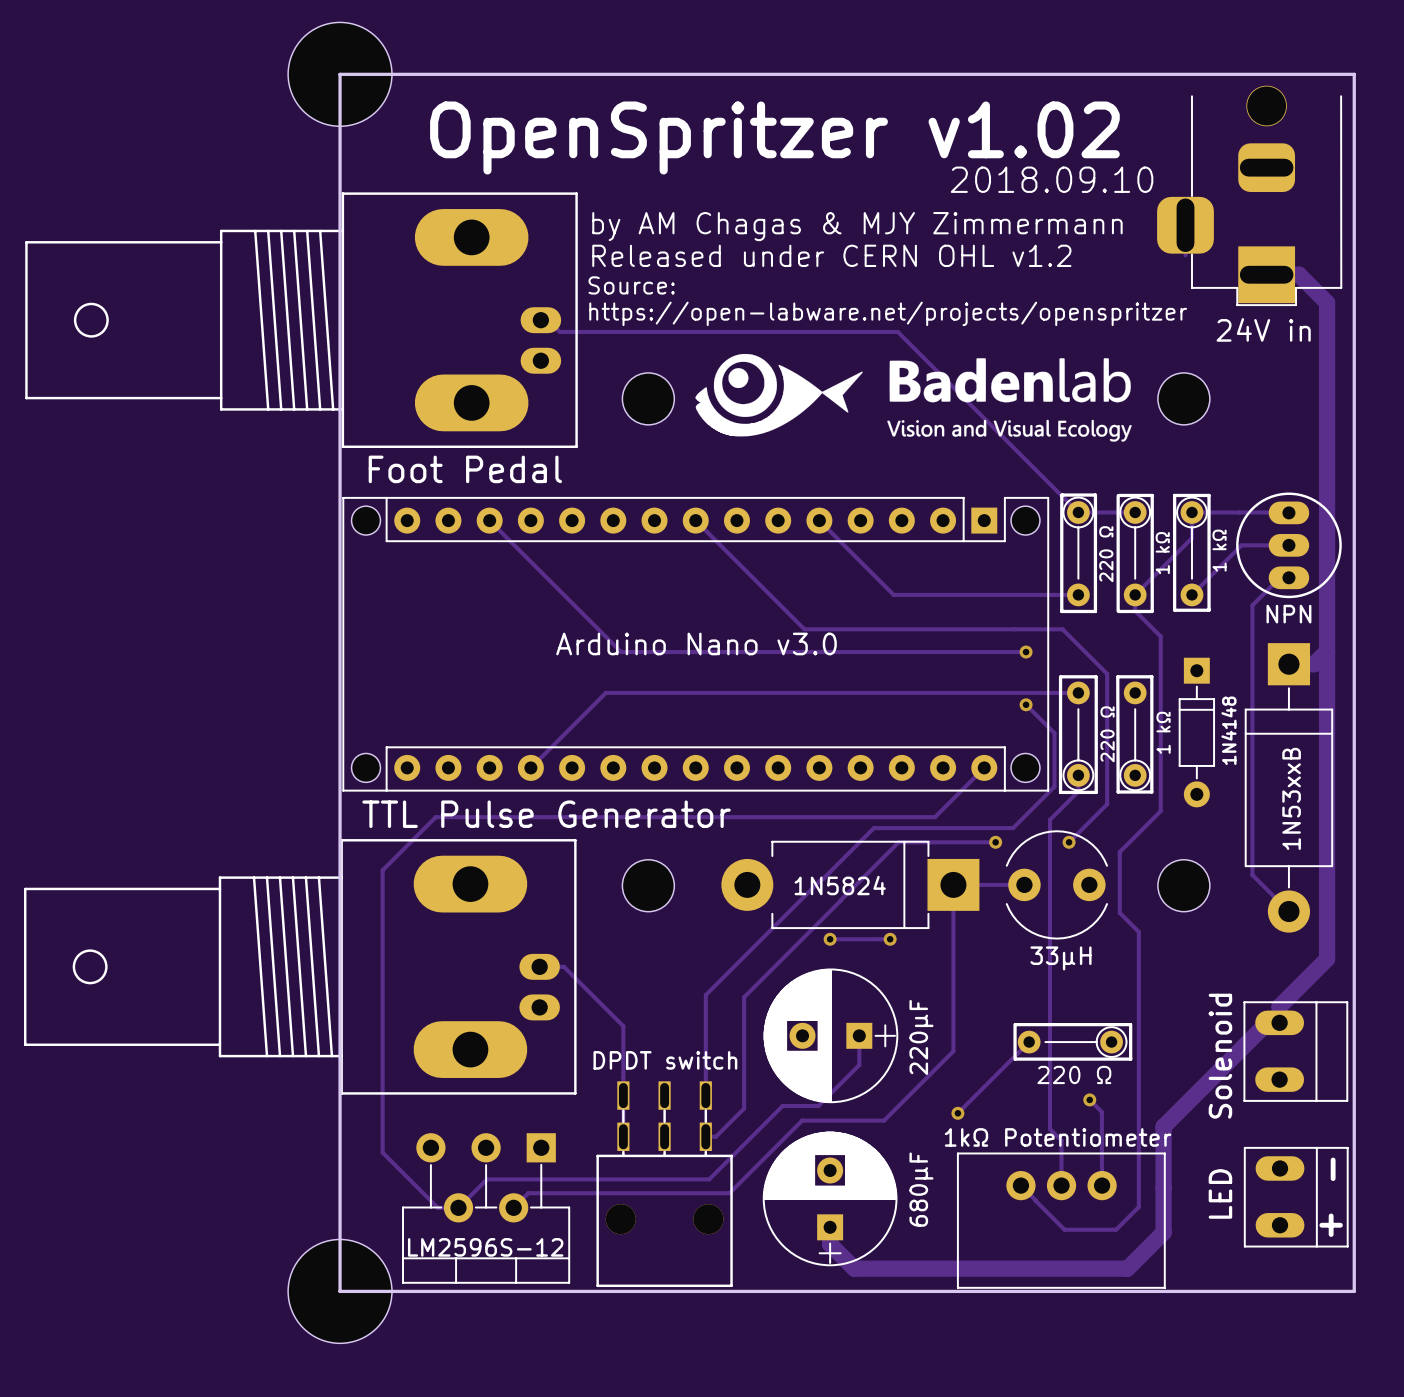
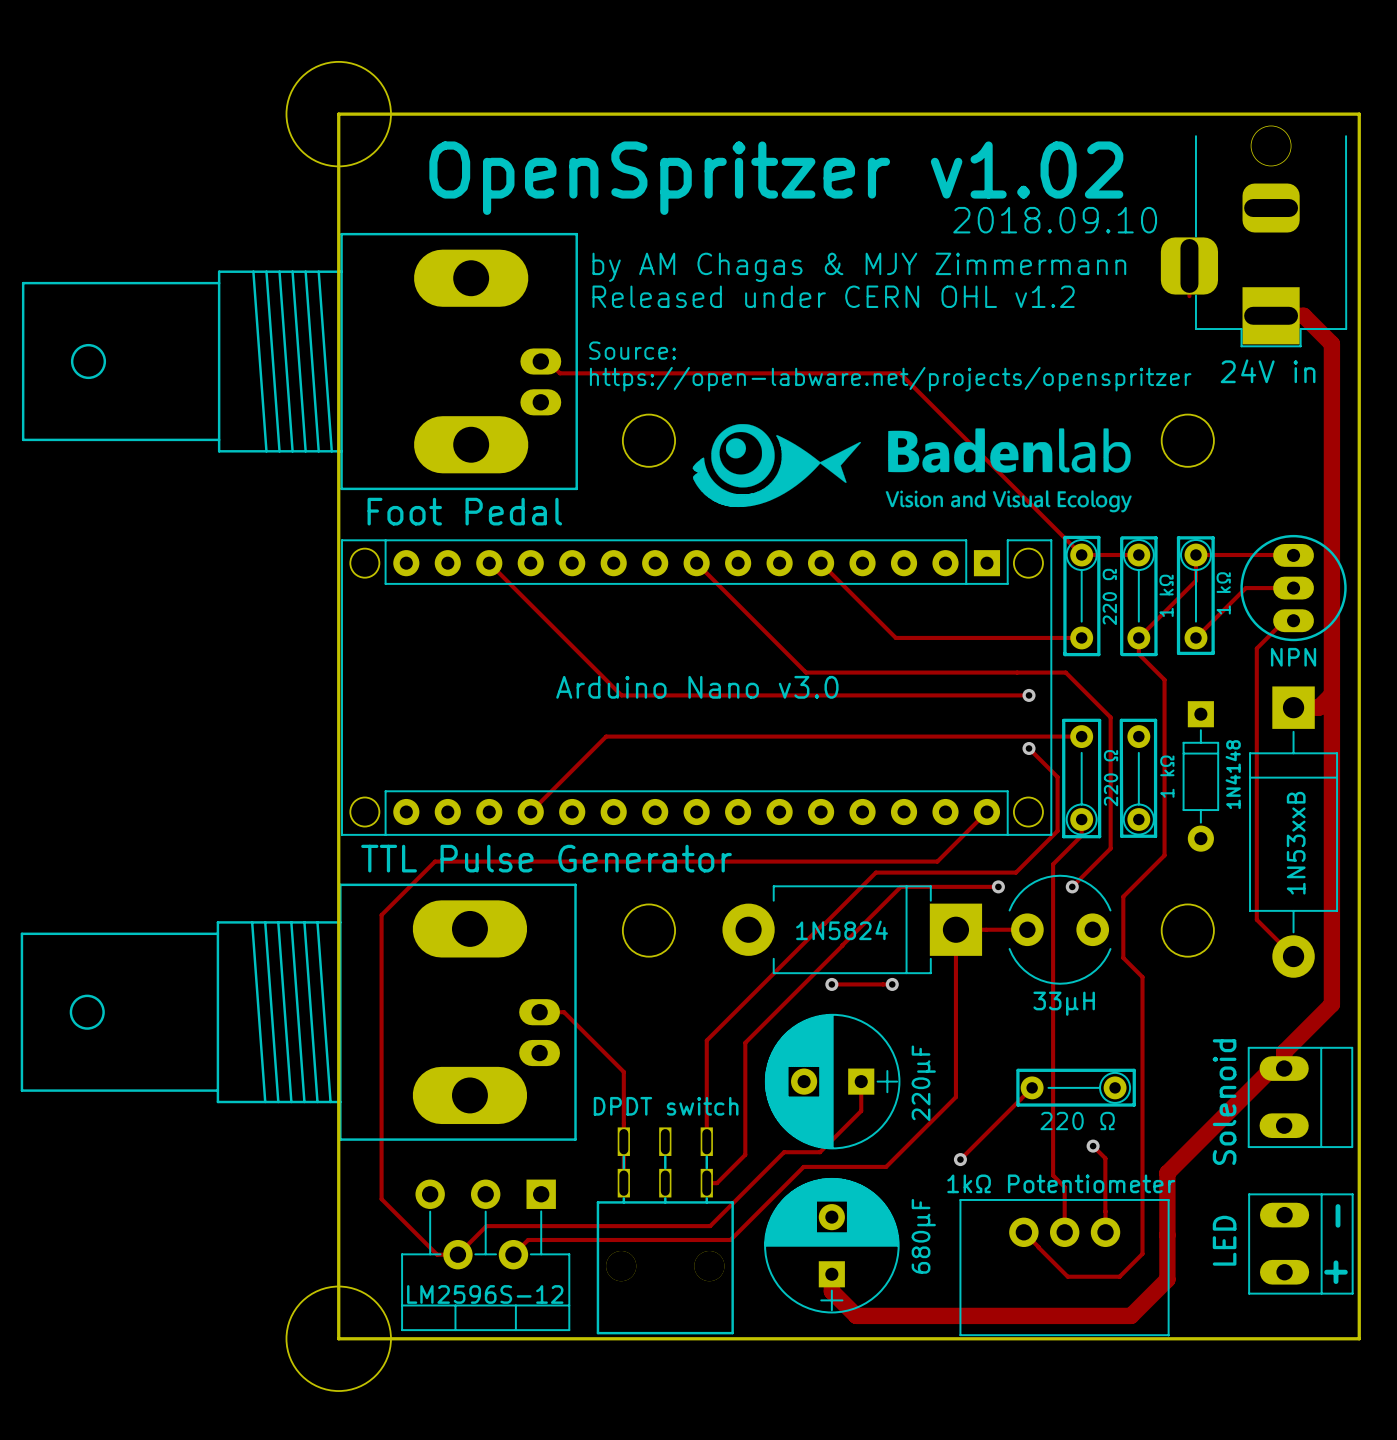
text position: Source: (631, 285) -> Source: (632, 350)
text position: https://open-labware.net/projects/openspritzer (888, 313) -> https://open-labware.net/projects/openspritzer (890, 379)
drawing position: (913, 397) -> (912, 468)

